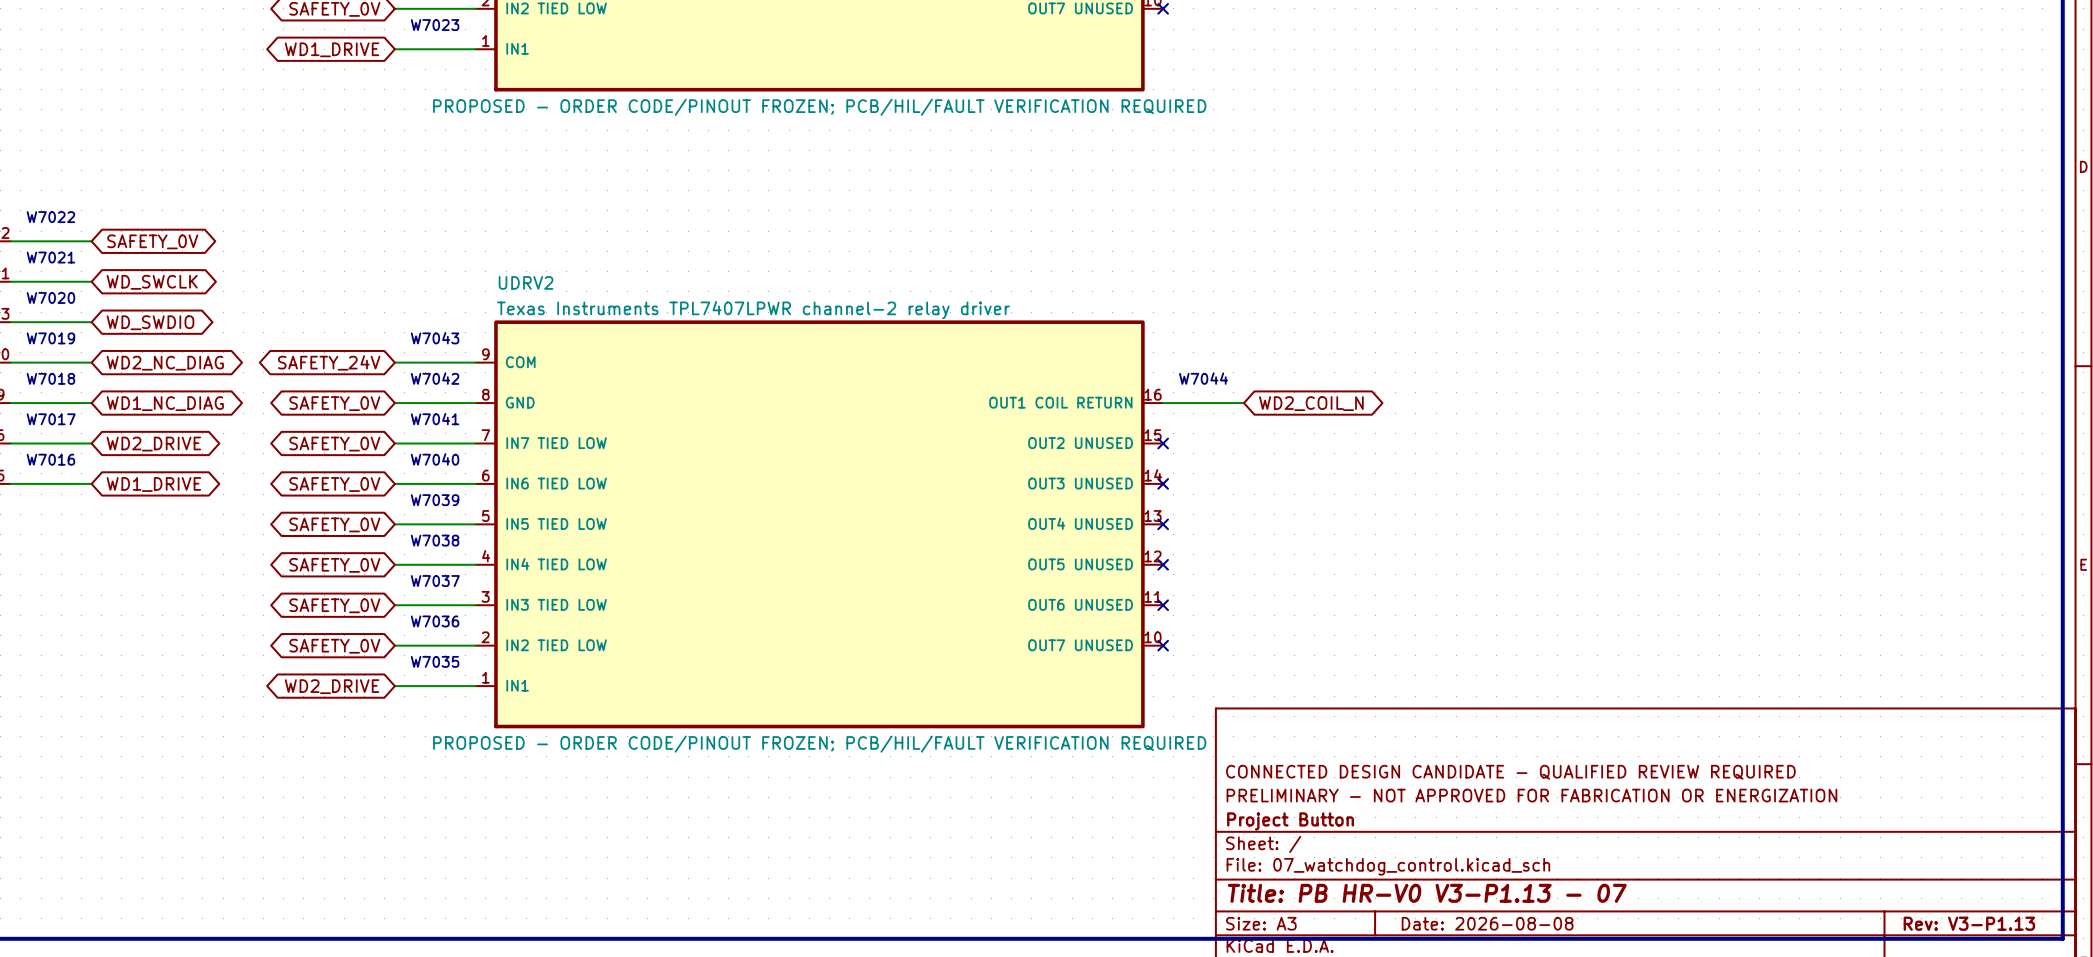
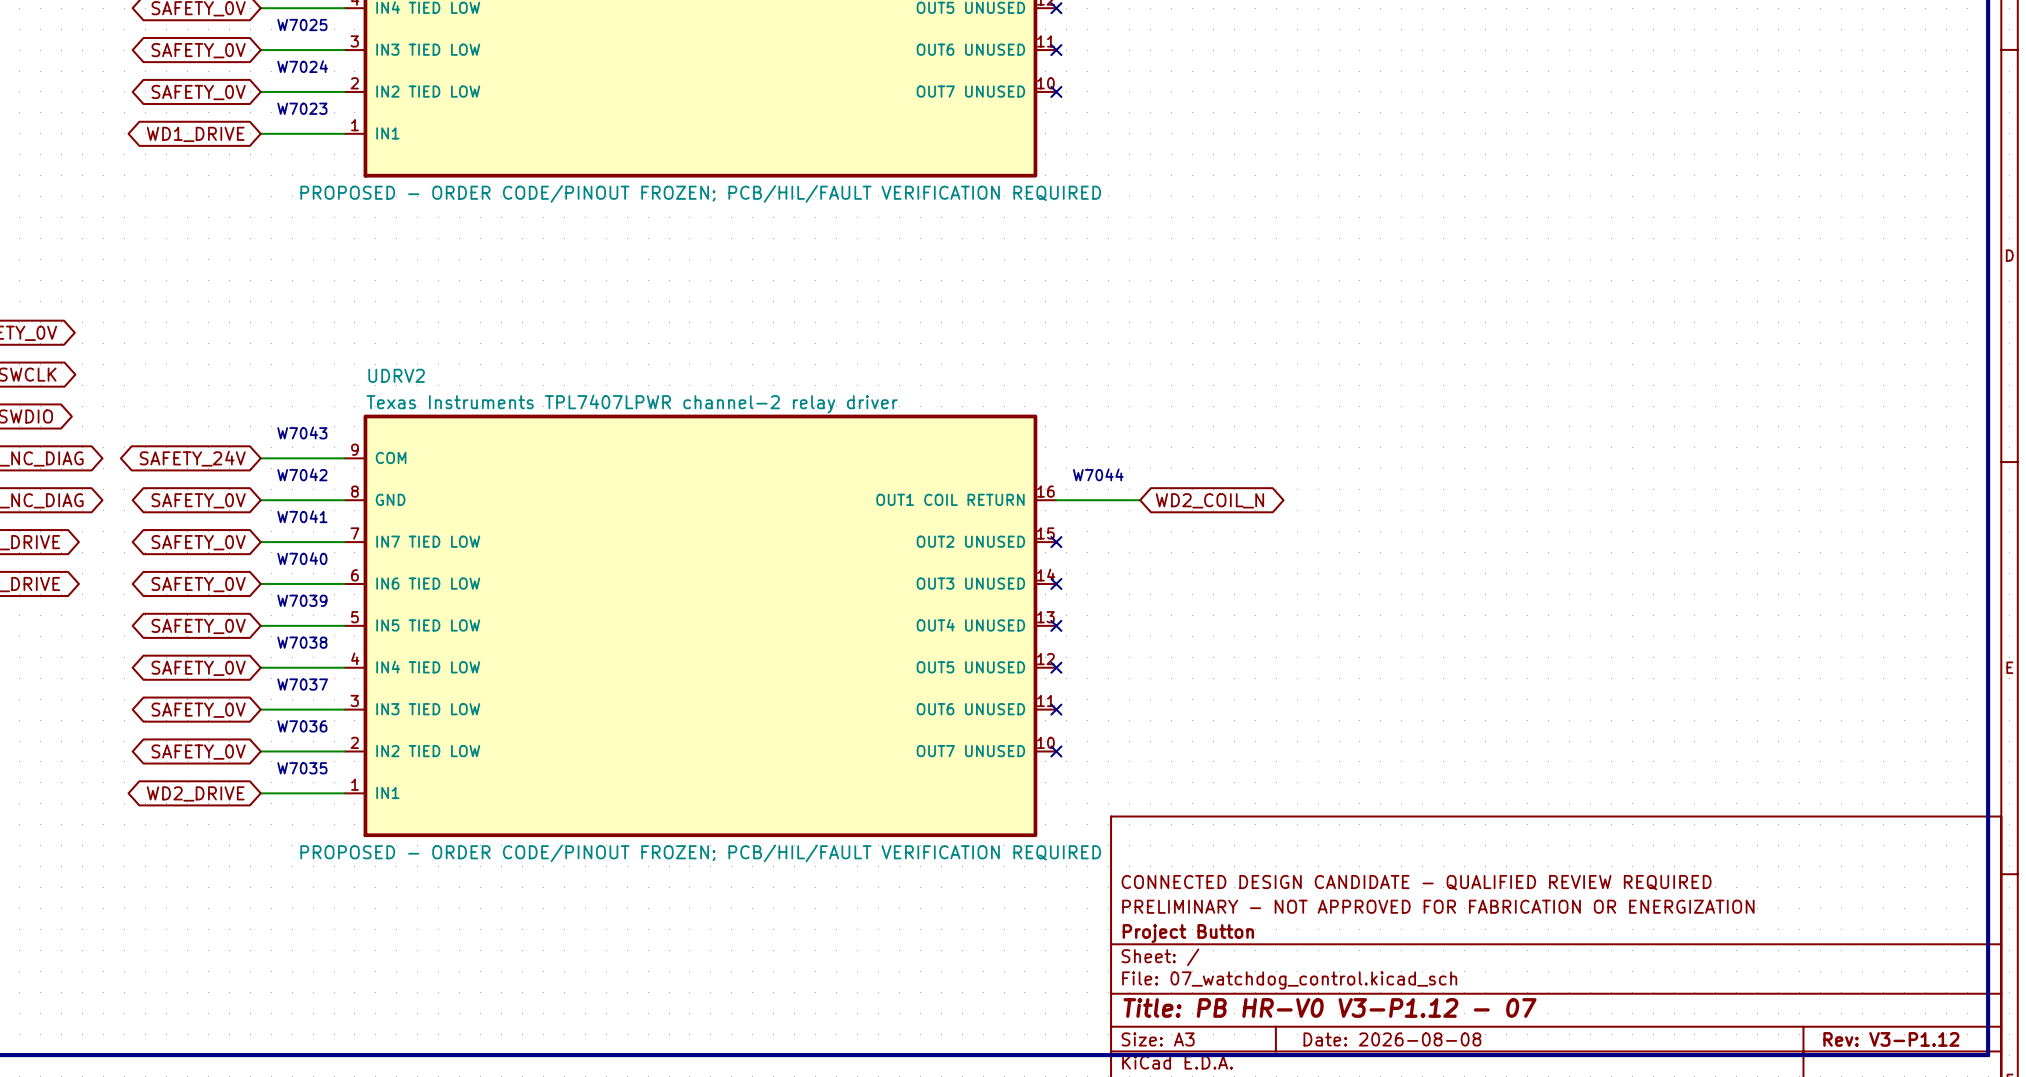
title block: Title: PB HR-V0 V3-P1.13 - 07 (1427, 893) -> Title: PB HR-V0 V3-P1.12 - 07 (1329, 1007)
title block: Rev: V3-P1.13 (1969, 923) -> Rev: V3-P1.12 (1891, 1039)

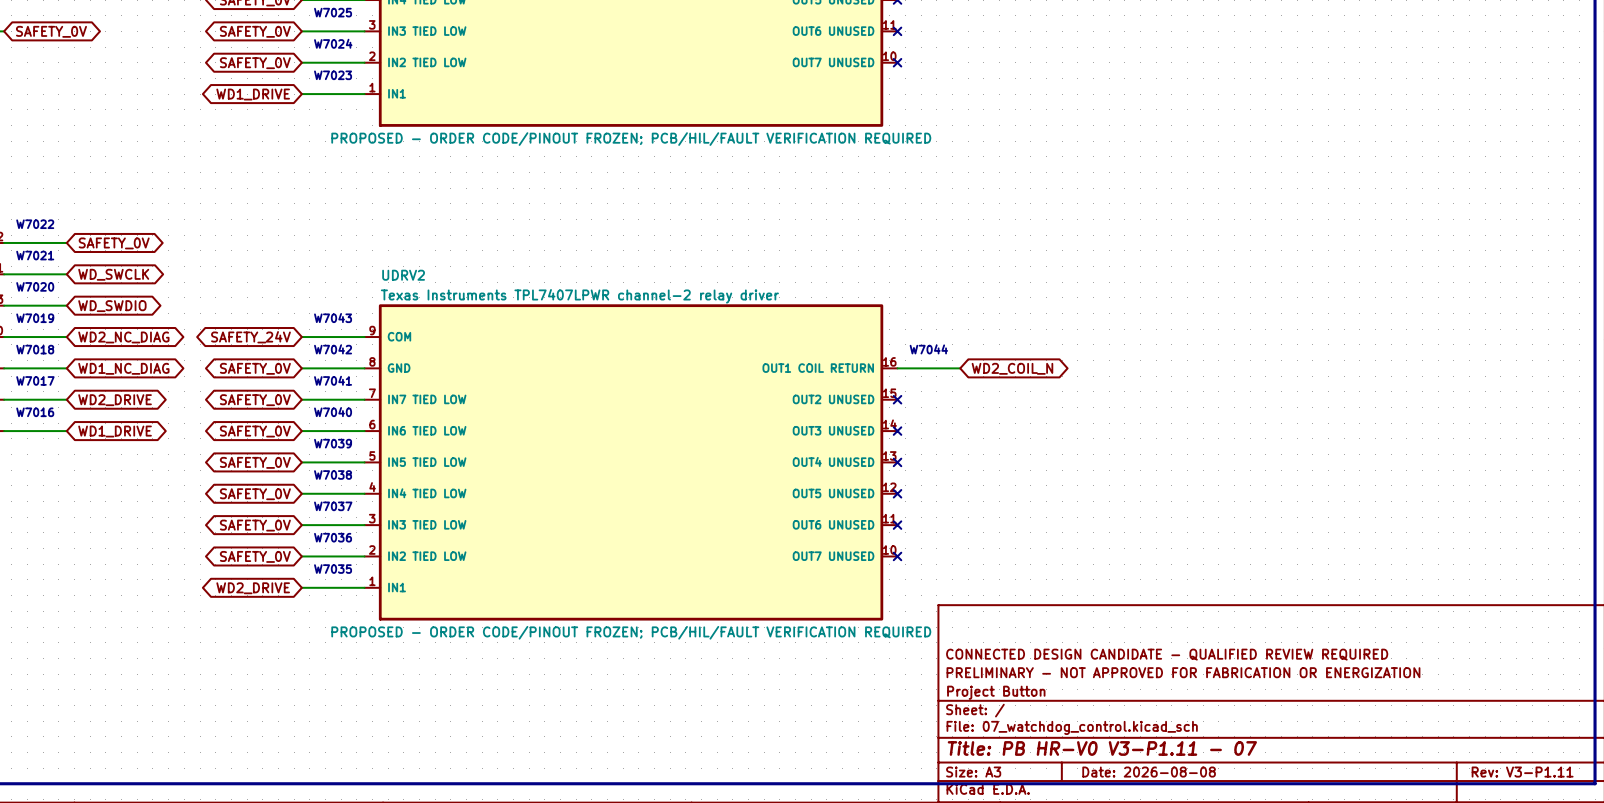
title block: Title: PB HR-V0 V3-P1.12 - 07 (1329, 1007) -> Title: PB HR-V0 V3-P1.11 - 07 (1102, 748)
title block: Rev: V3-P1.12 (1891, 1039) -> Rev: V3-P1.11 (1522, 772)

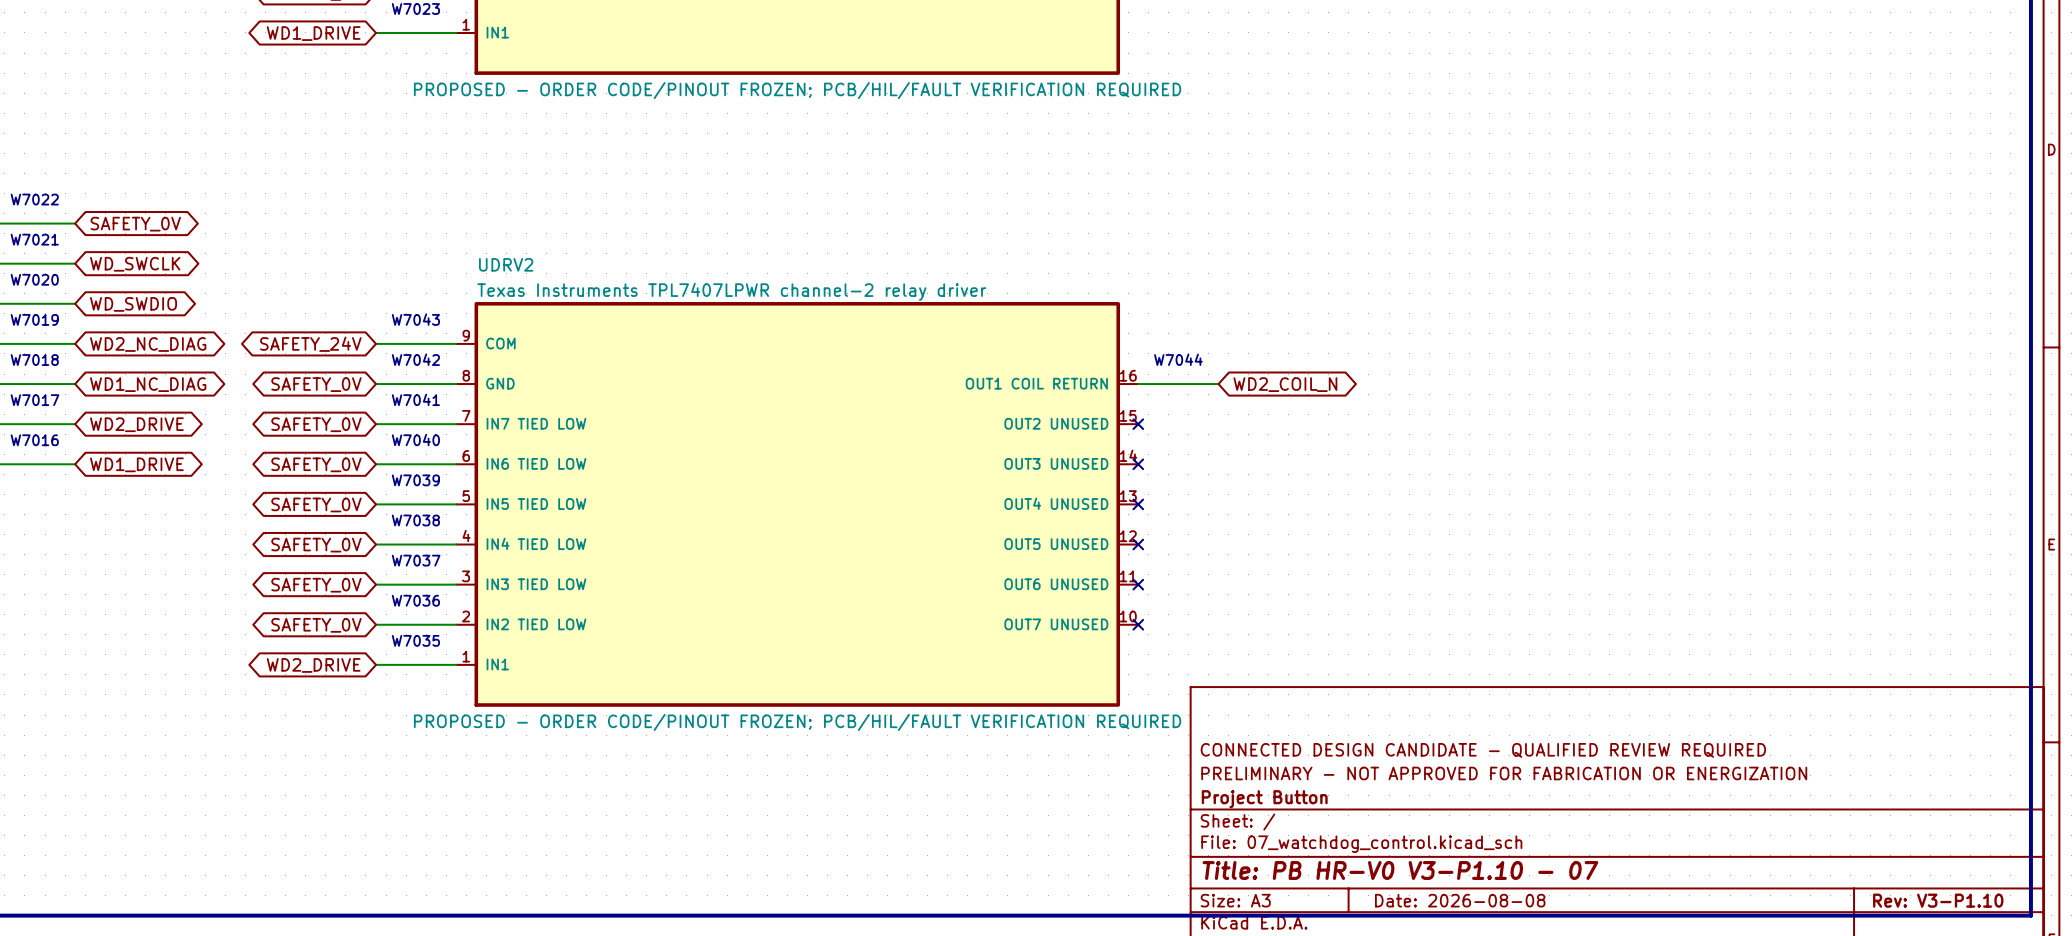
title block: Title: PB HR-V0 V3-P1.11 - 07 (1102, 748) -> Title: PB HR-V0 V3-P1.10 - 07 (1400, 870)
title block: Rev: V3-P1.11 (1522, 772) -> Rev: V3-P1.10 (1938, 900)

